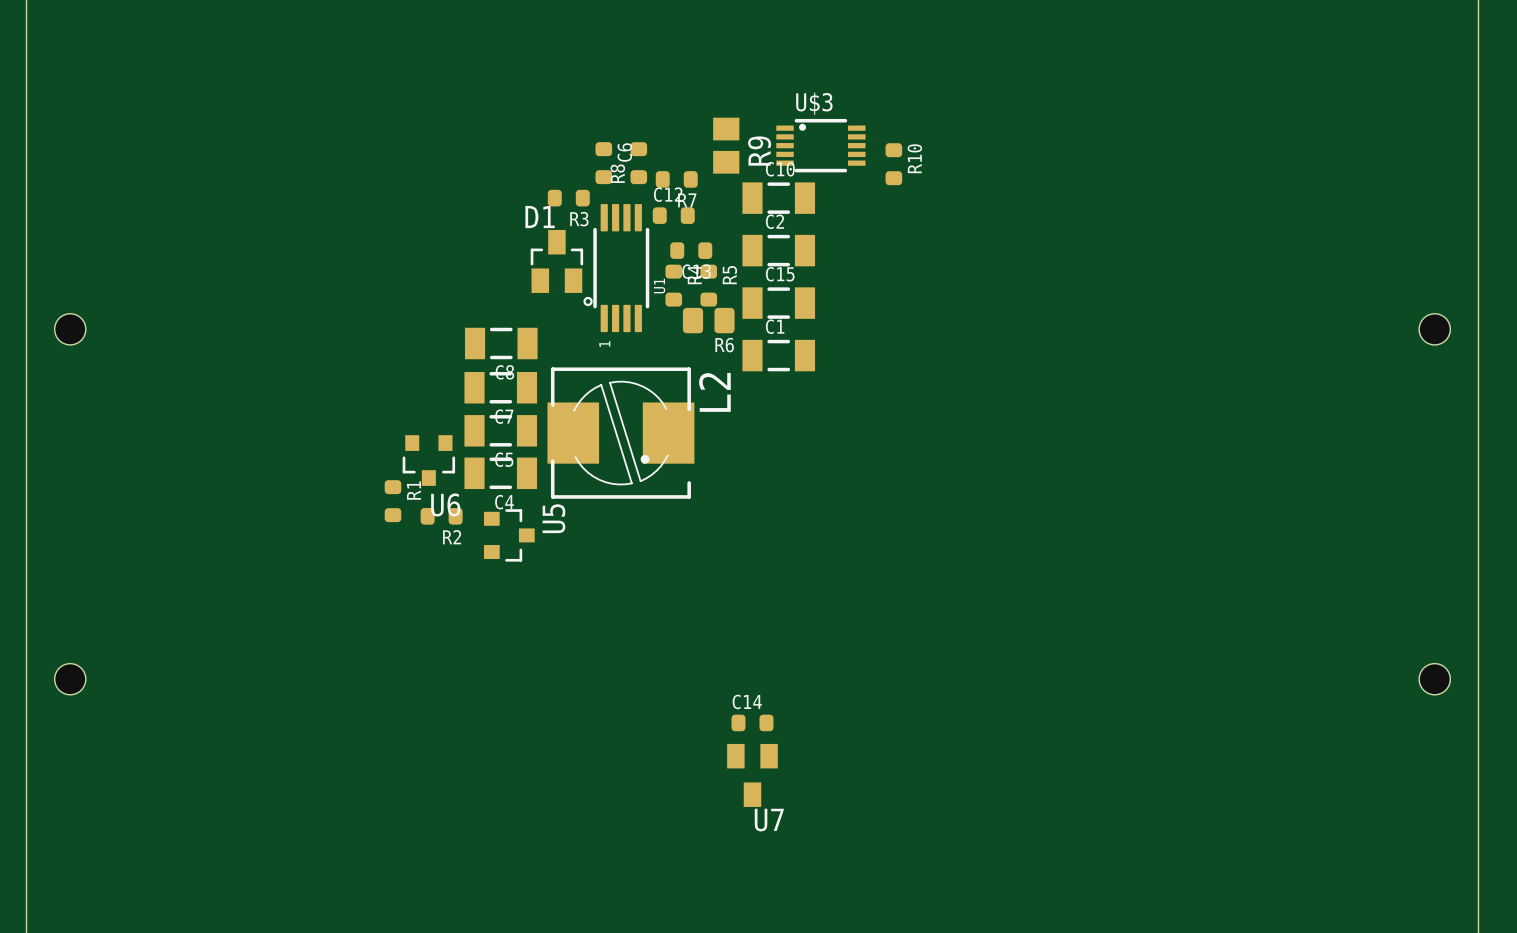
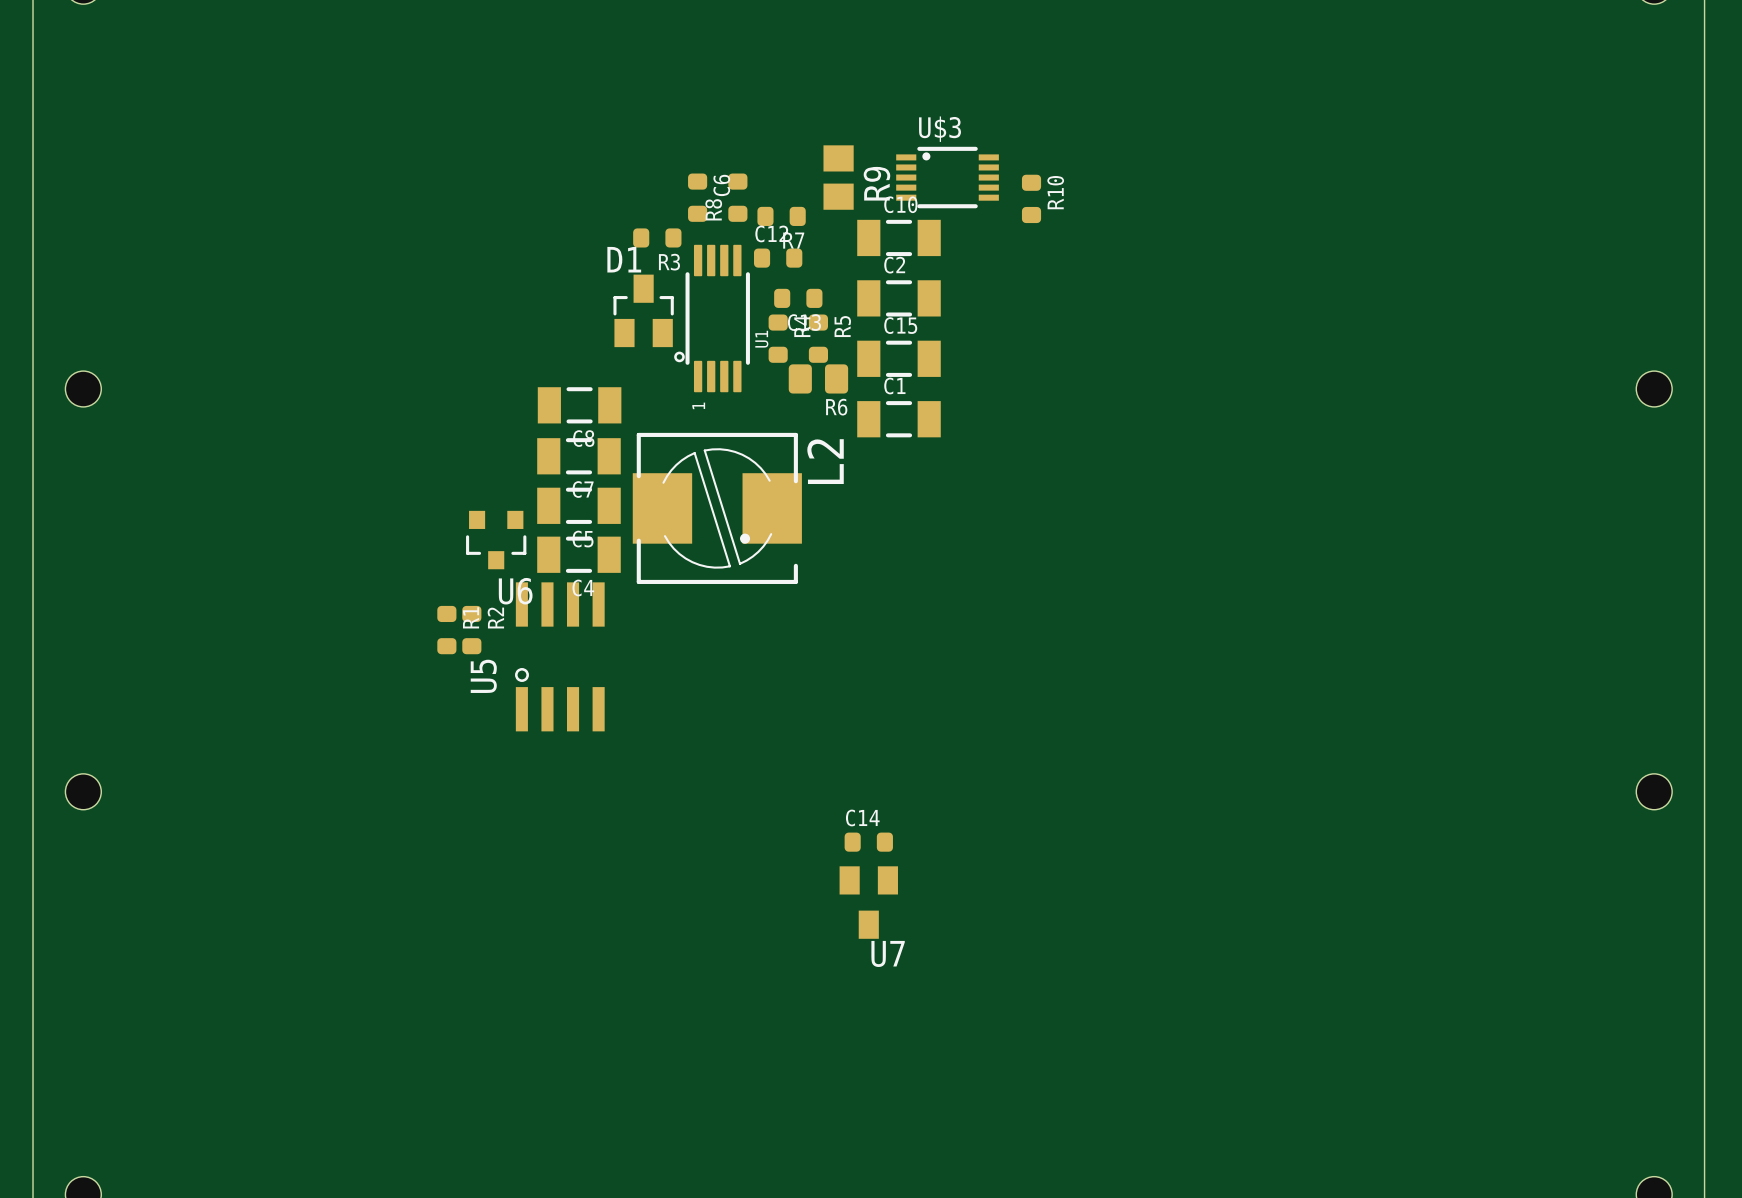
R1 position: (392, 501) -> (446, 630)
U5 footprint: [483, 509, 535, 562] -> [515, 582, 605, 732]
R2 rotation: 0° (441, 516) -> 90° clockwise (471, 630)
R2 position: (441, 516) -> (471, 630)
U5 name position: U5 (553, 518) -> U5 (483, 676)

